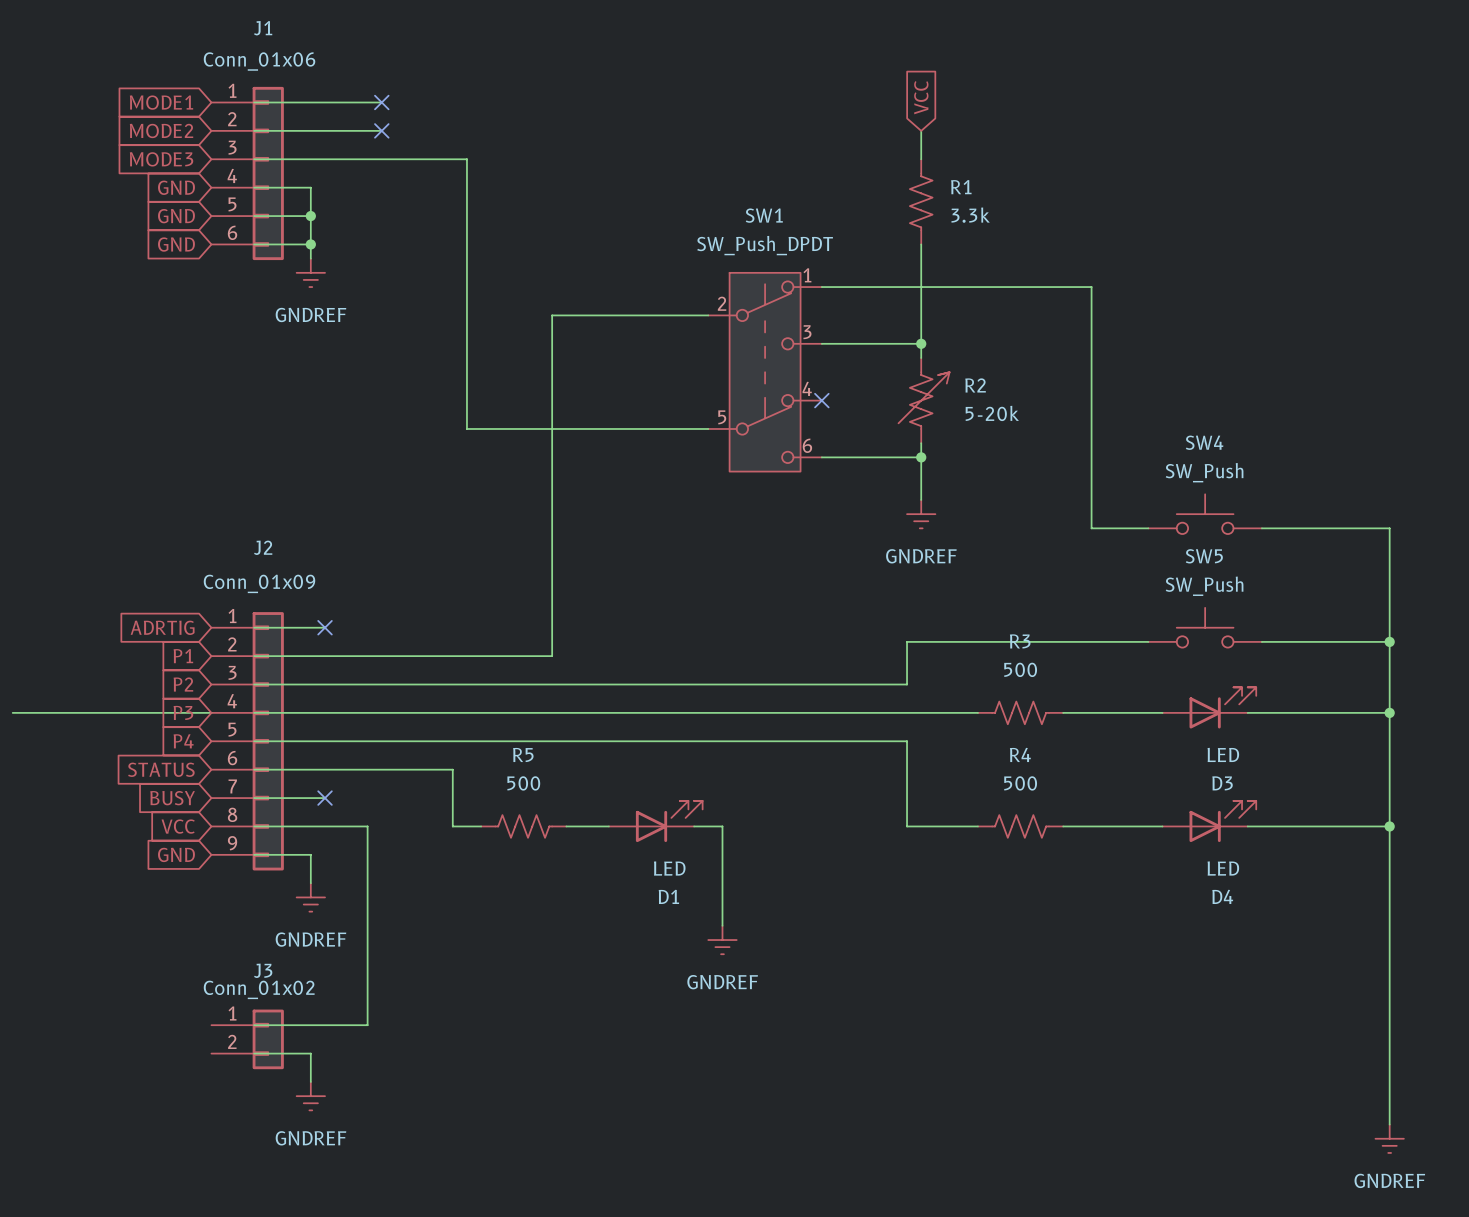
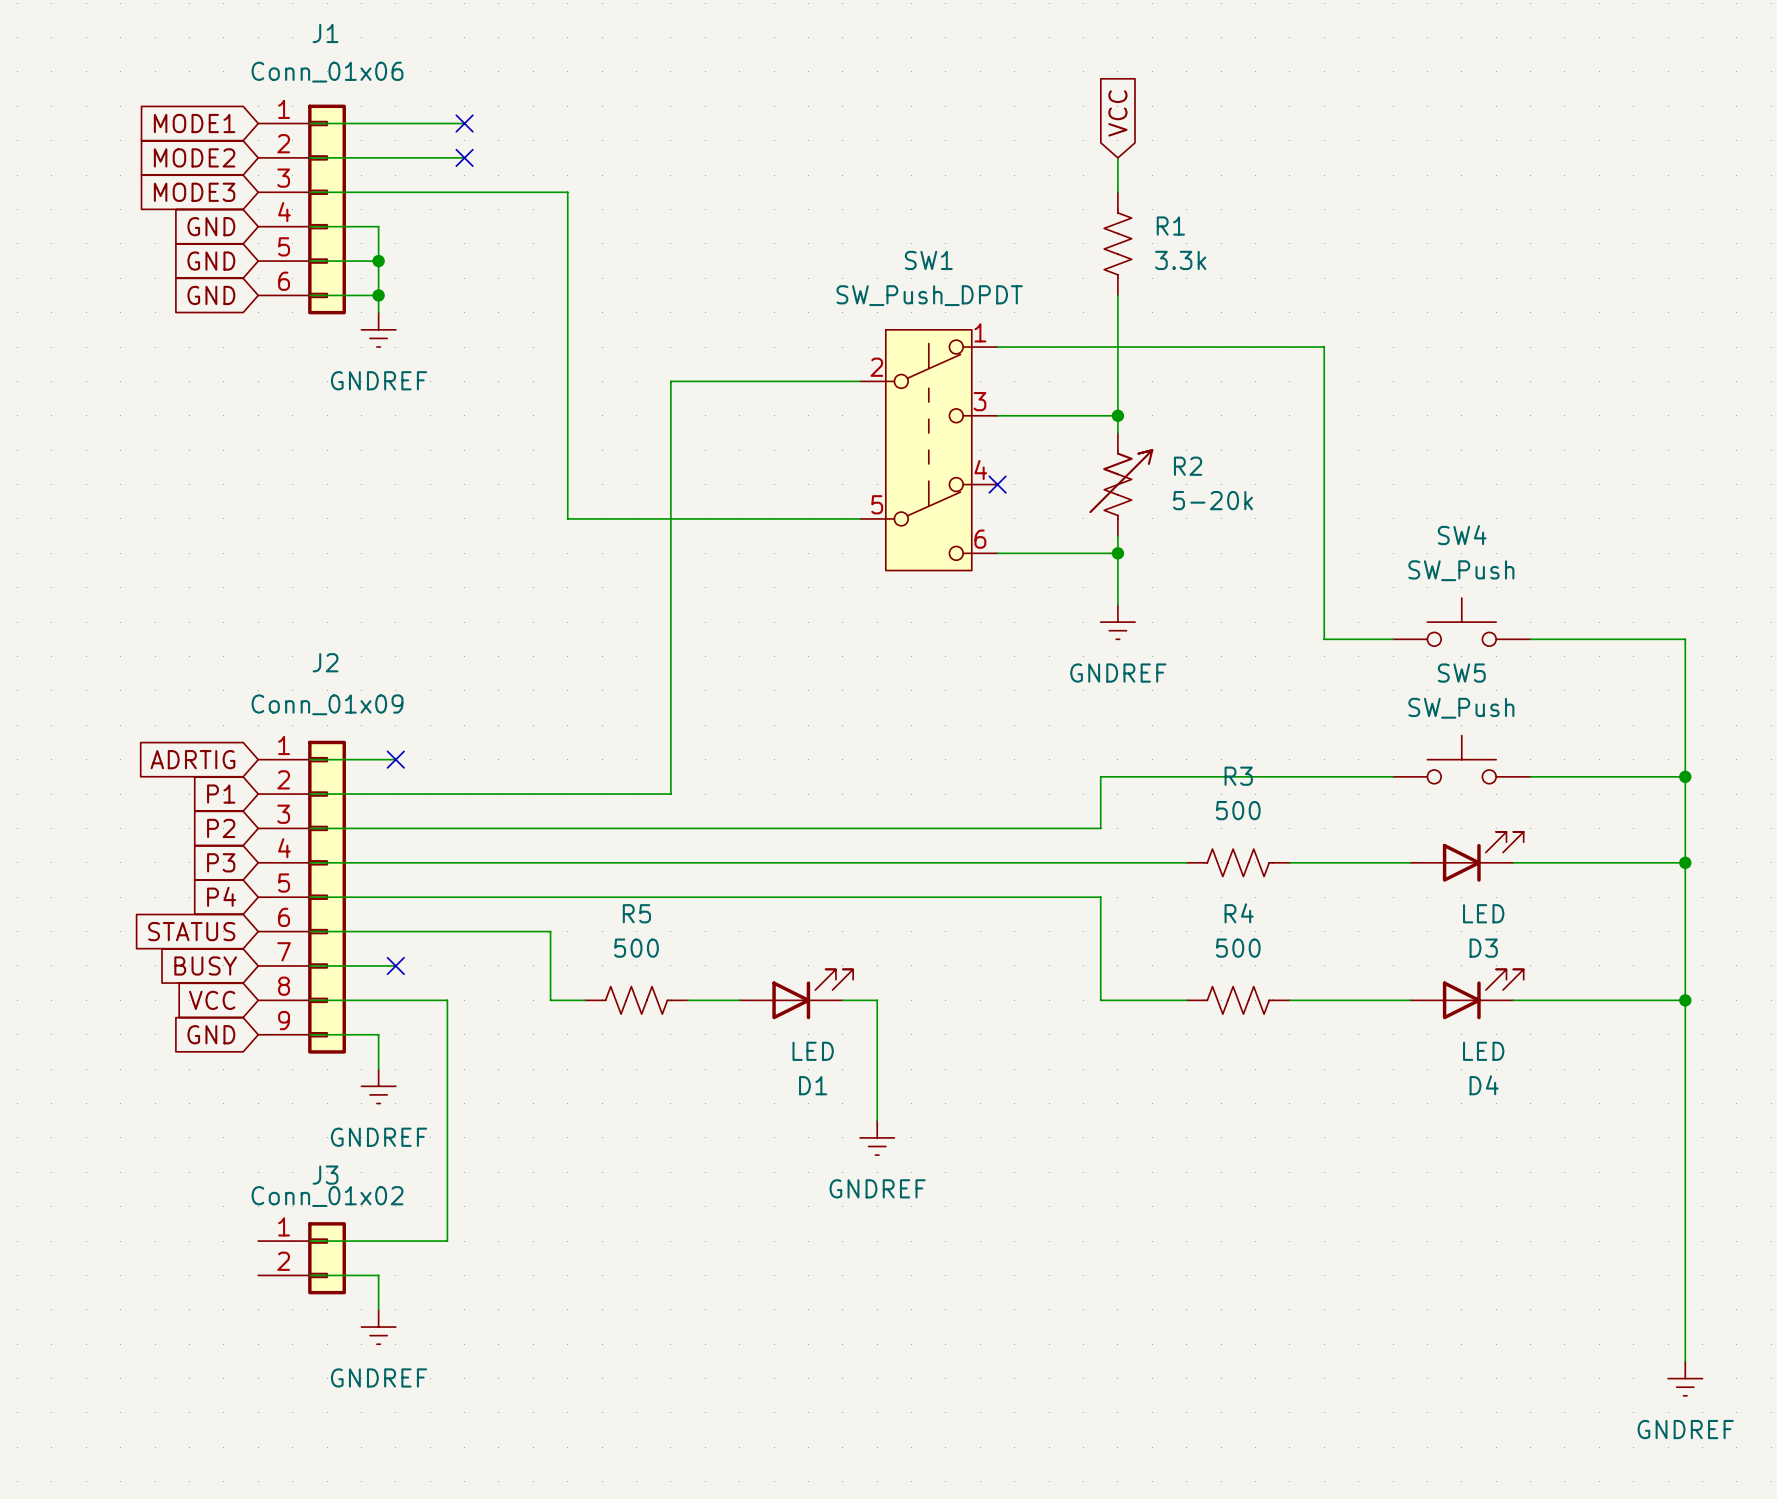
wire: (12, 712) (211, 712) -> none

